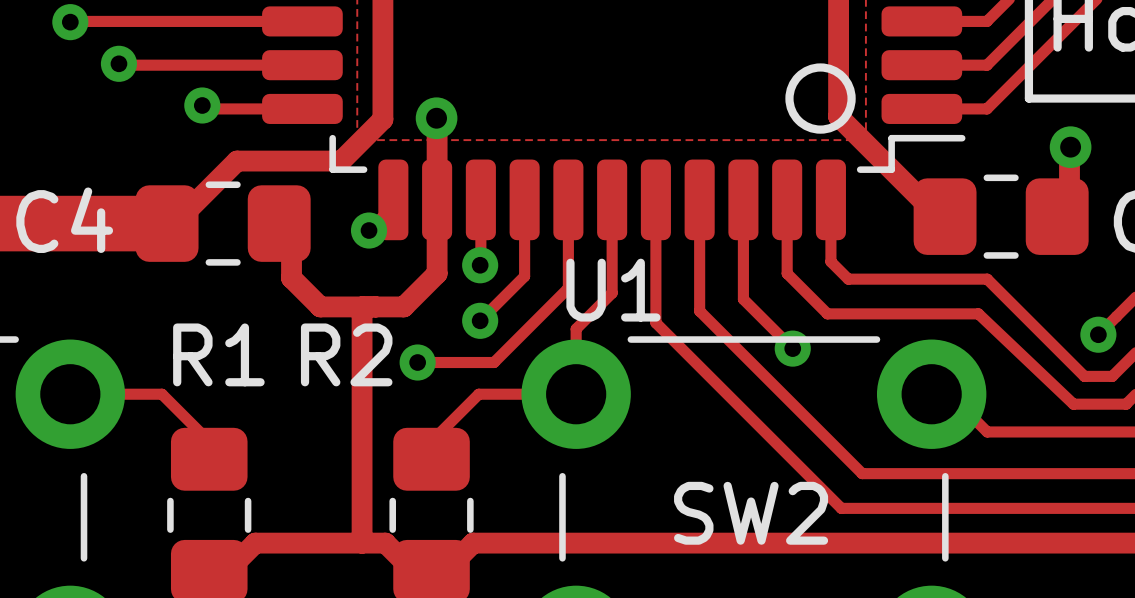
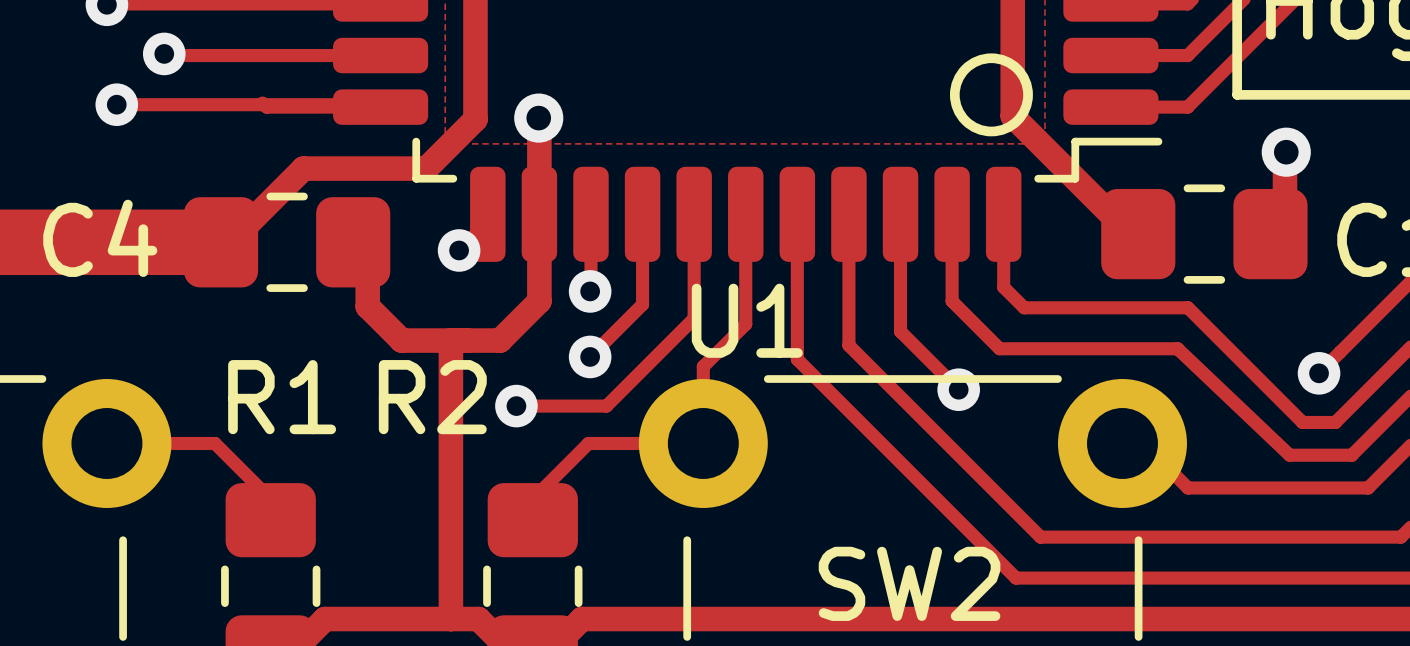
via position: (202, 105) -> (116, 104)
track: none -> (116, 104) (378, 104) (380, 107)

